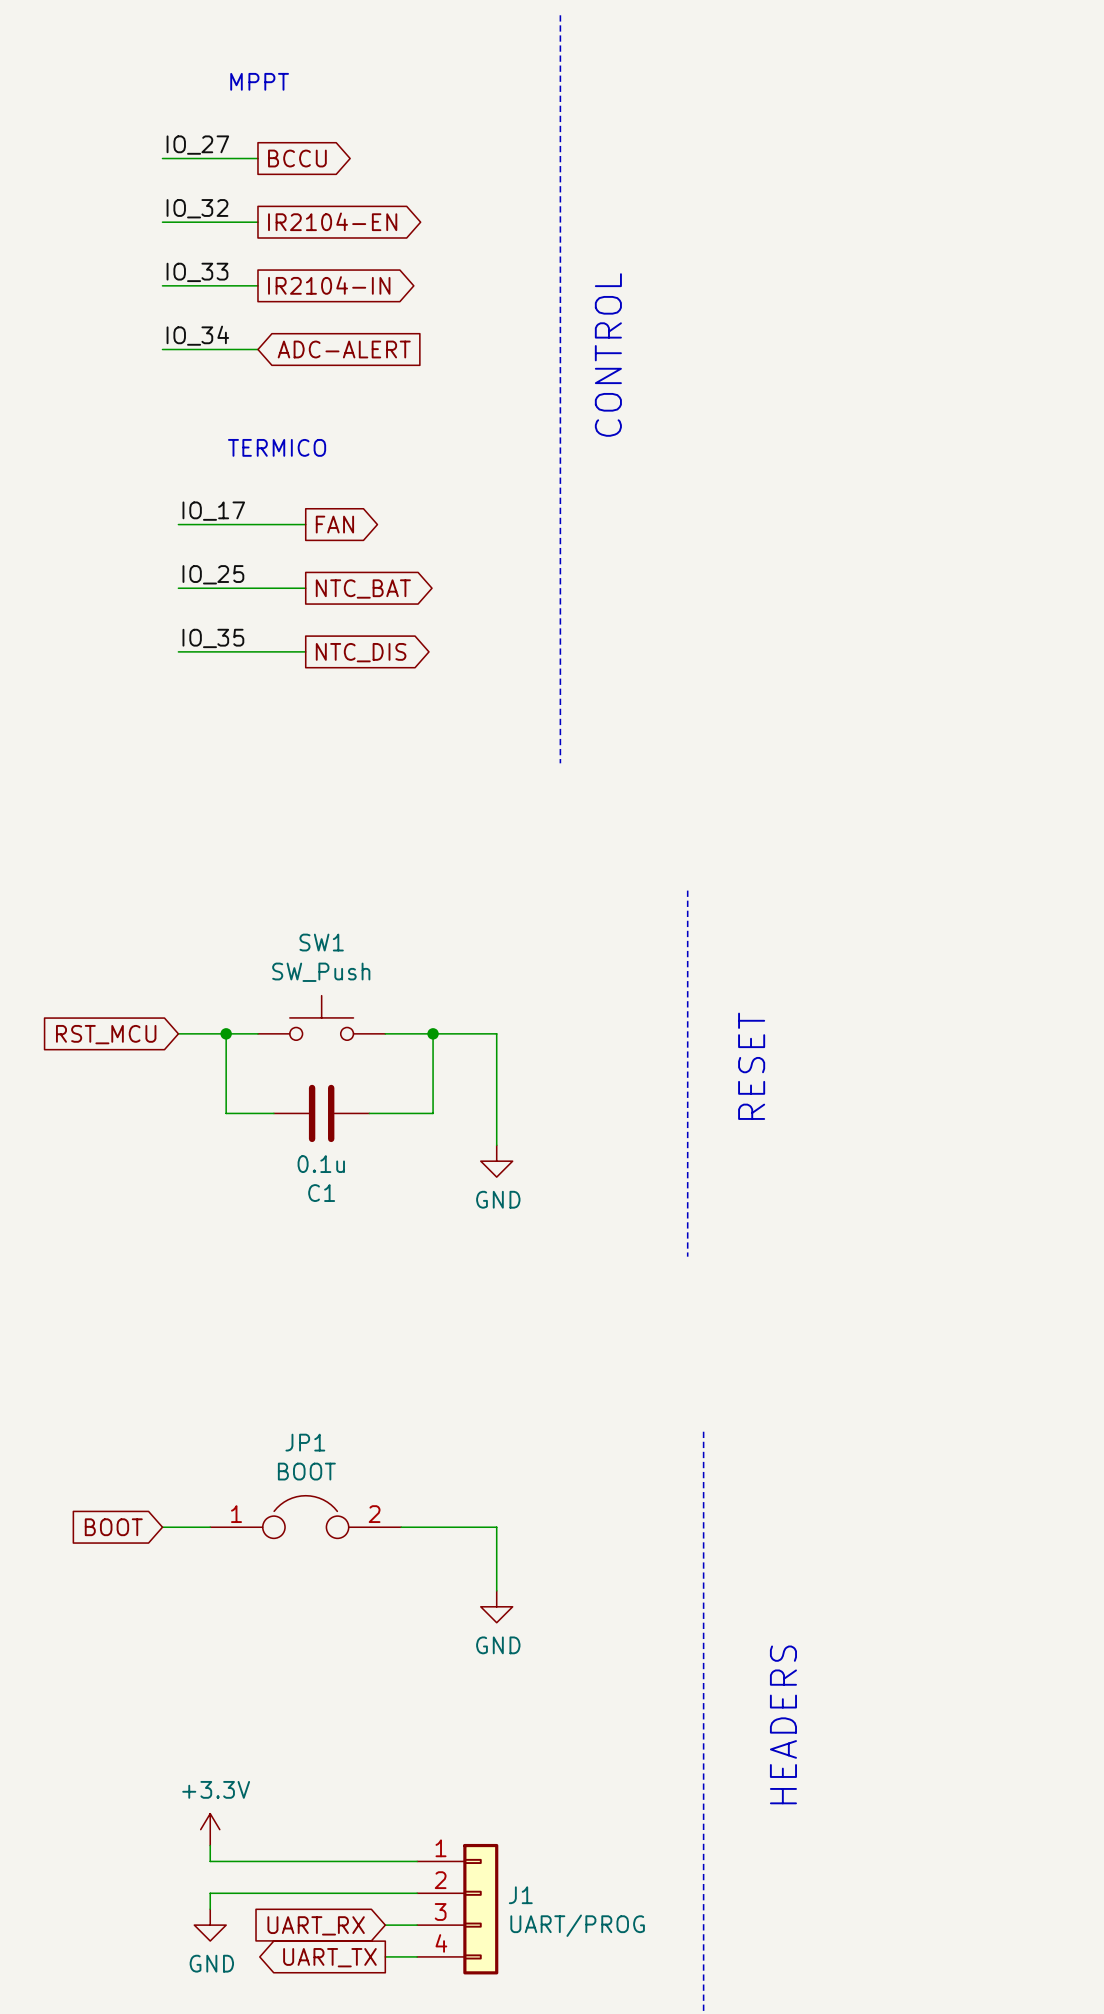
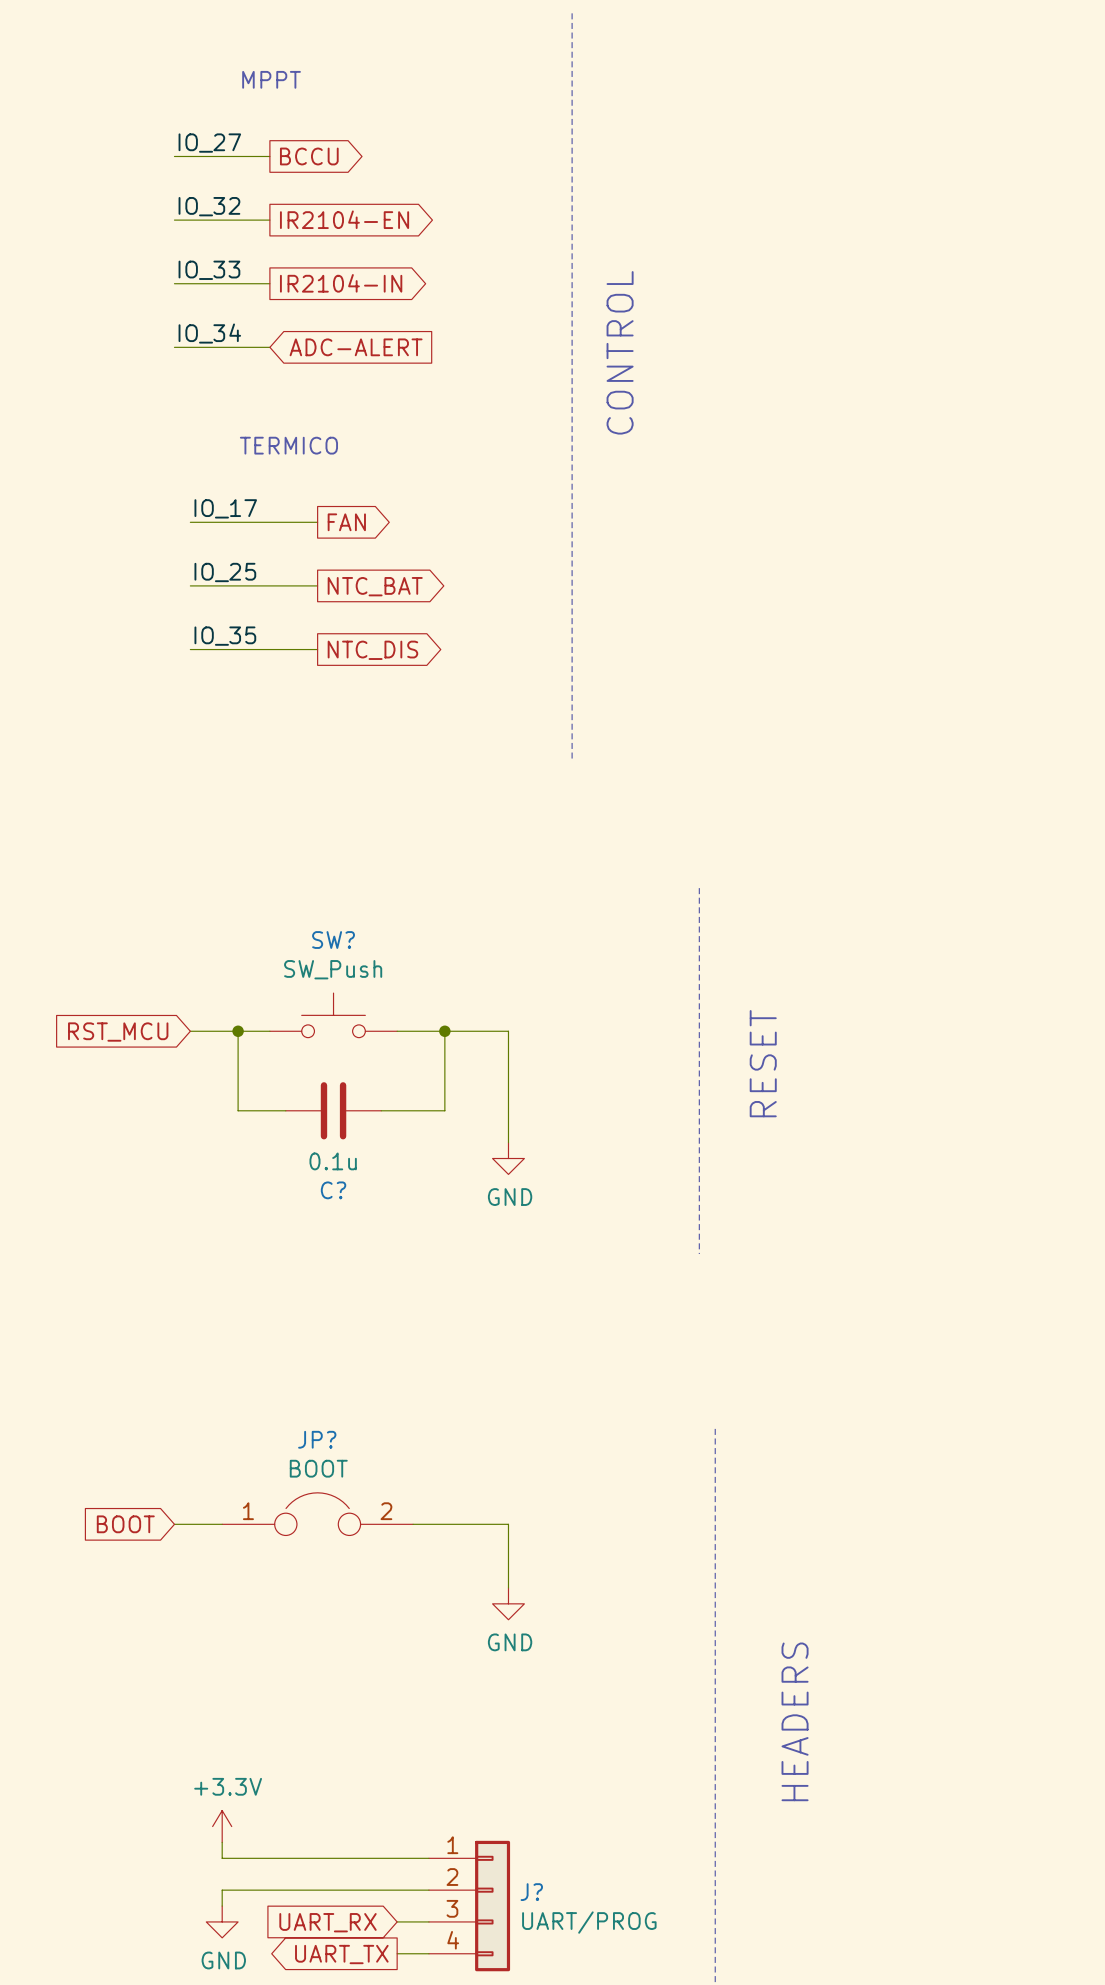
SW1 name: SW1 (321, 942) -> SW? (333, 940)
C1 name: C1 (321, 1193) -> C? (333, 1190)
JP1 name: JP1 (305, 1442) -> JP? (317, 1439)
J1 name: J1 (520, 1895) -> J? (531, 1892)

